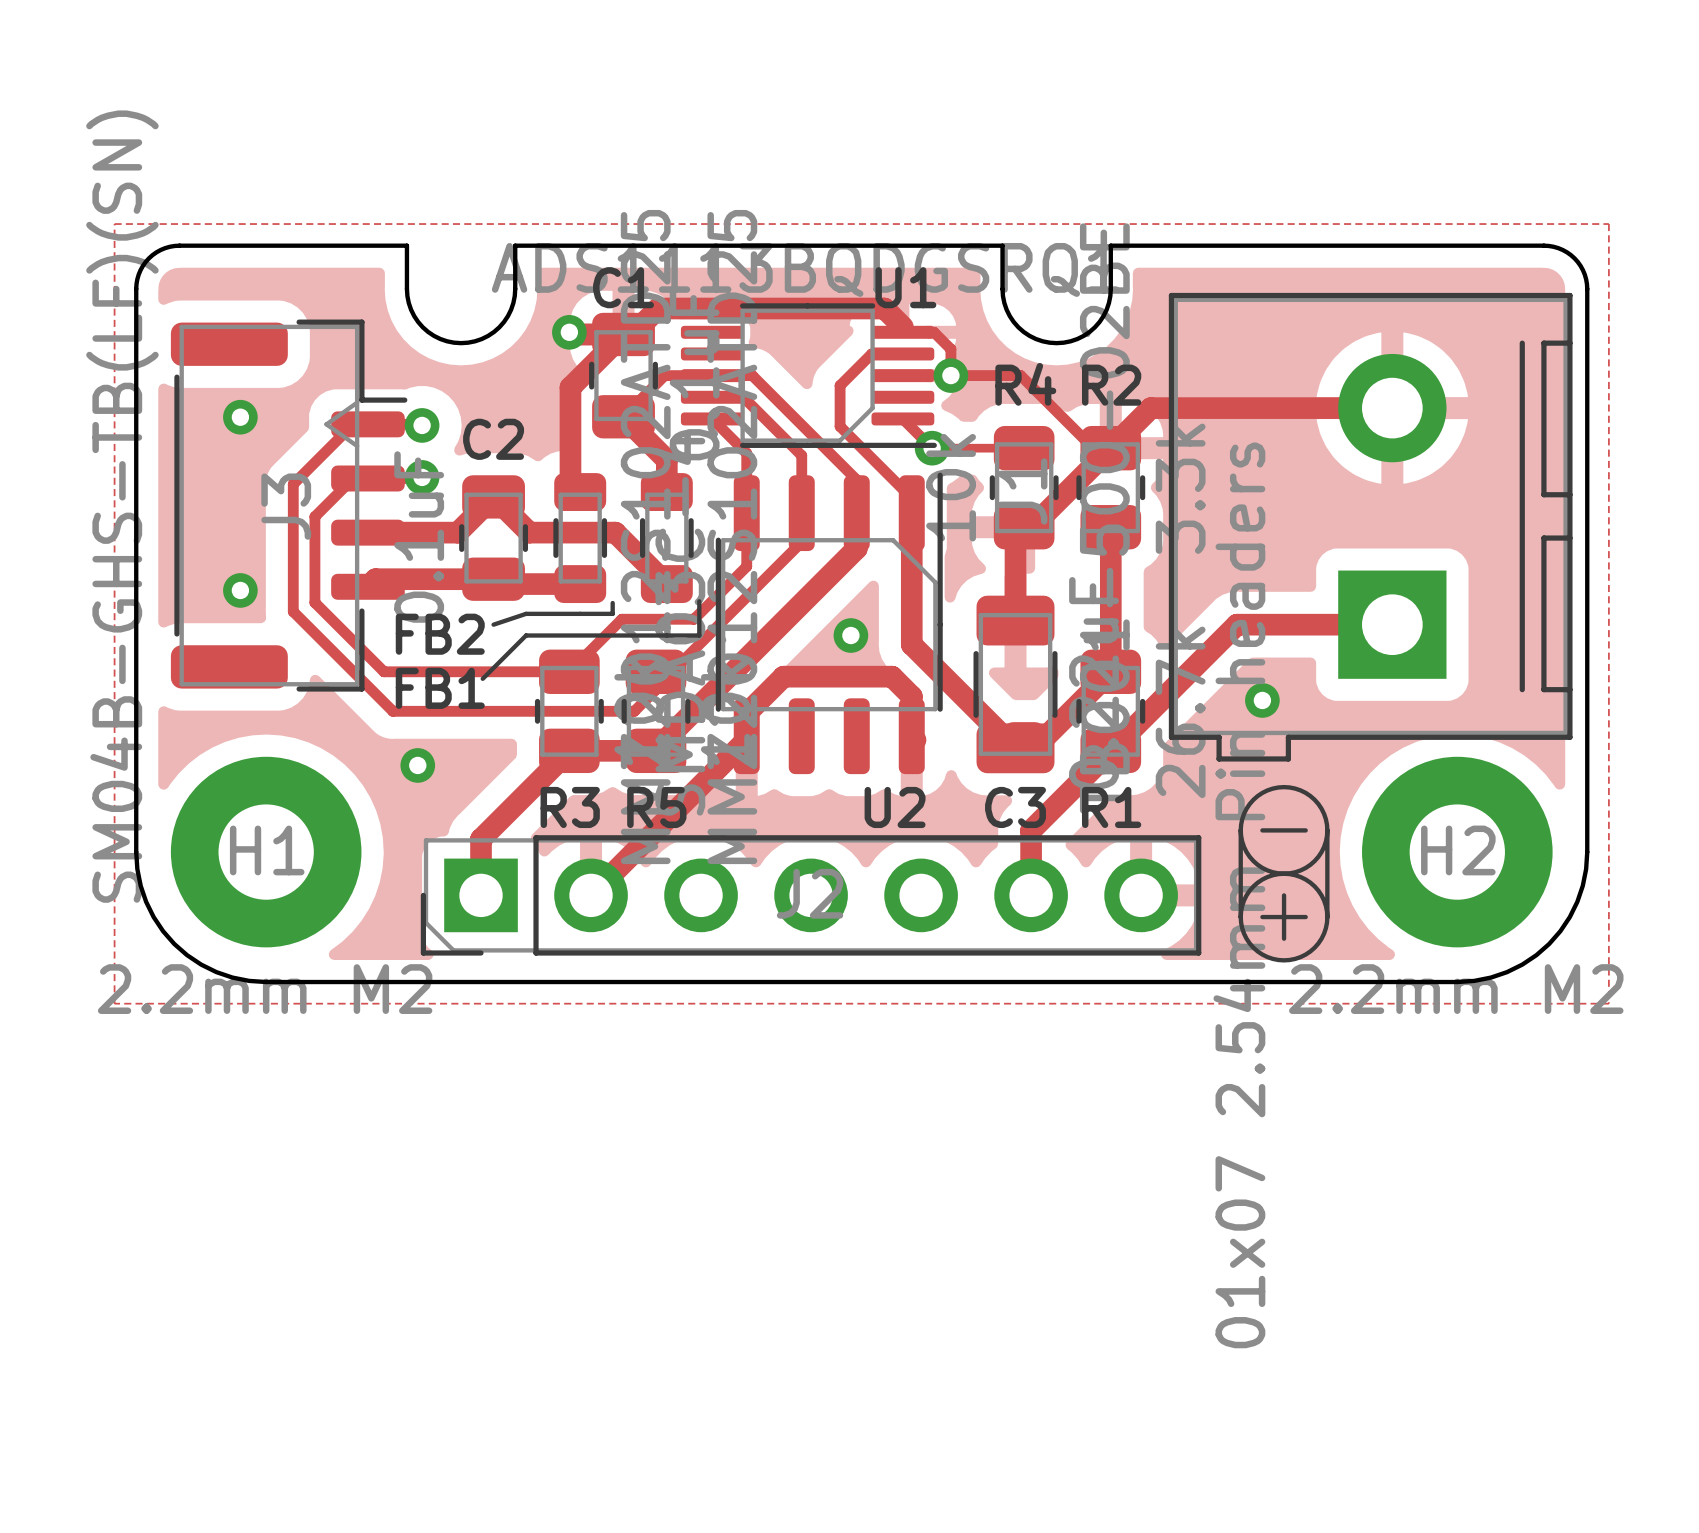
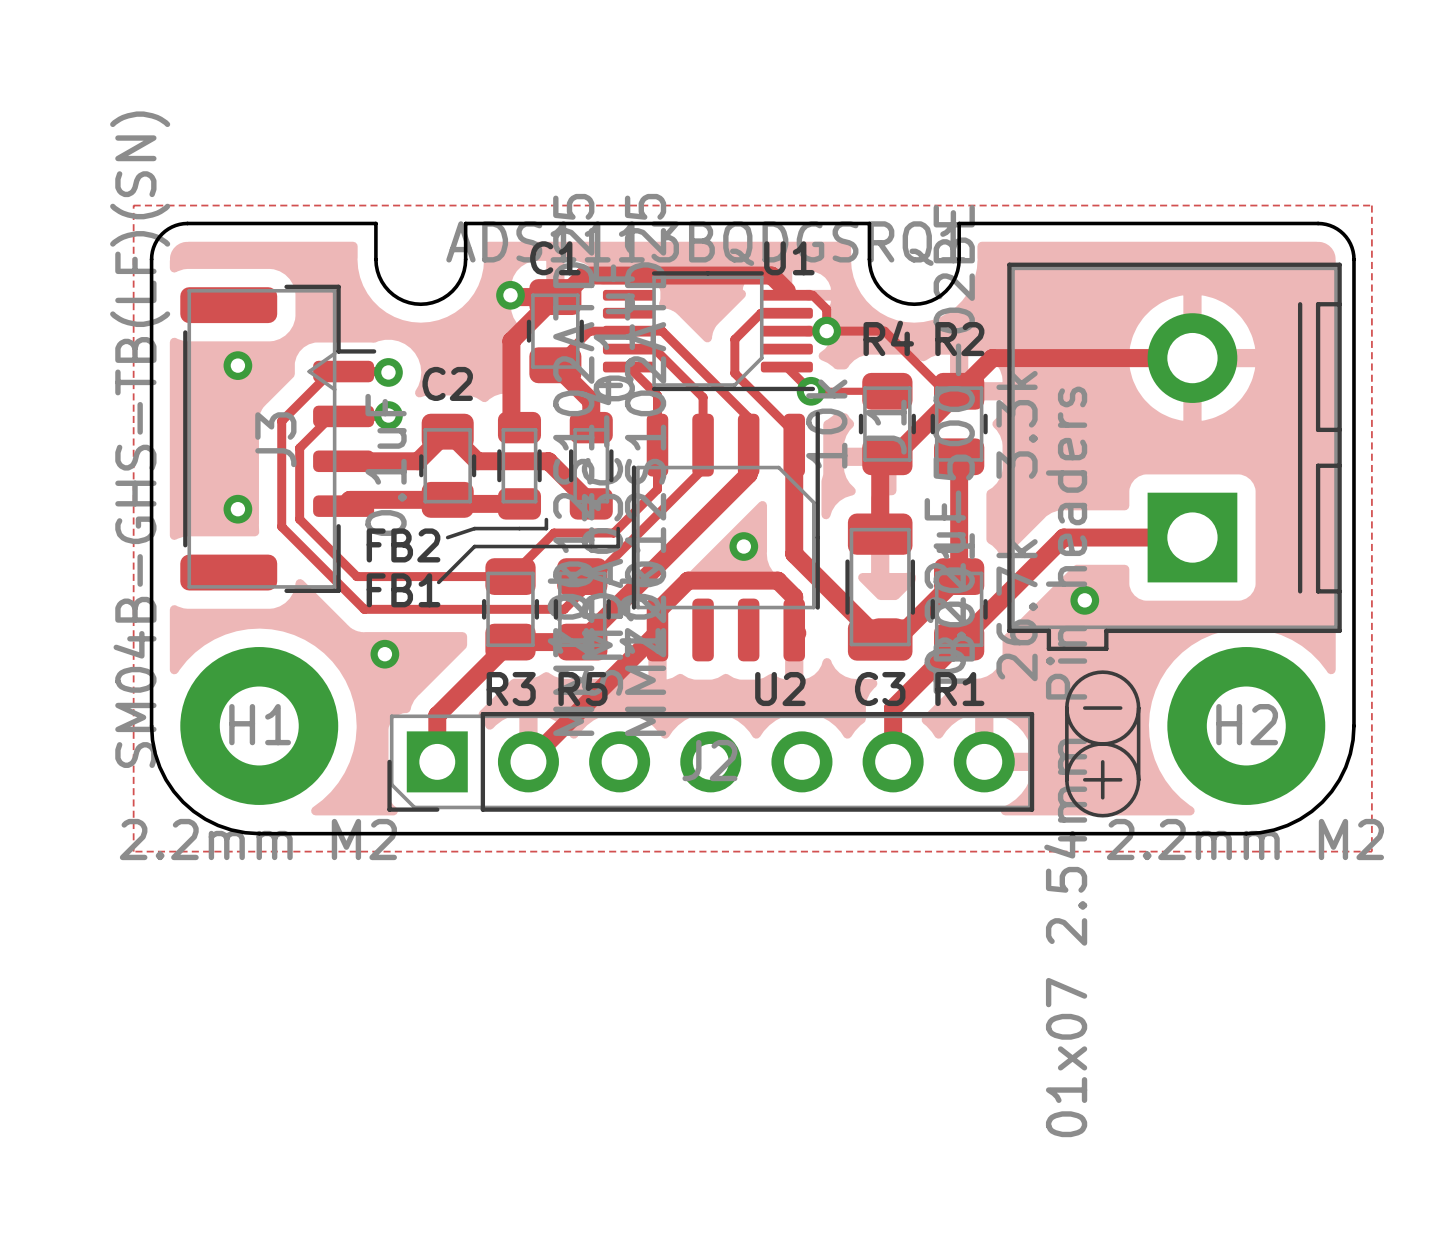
line: (699, 601) (699, 613) -> none

